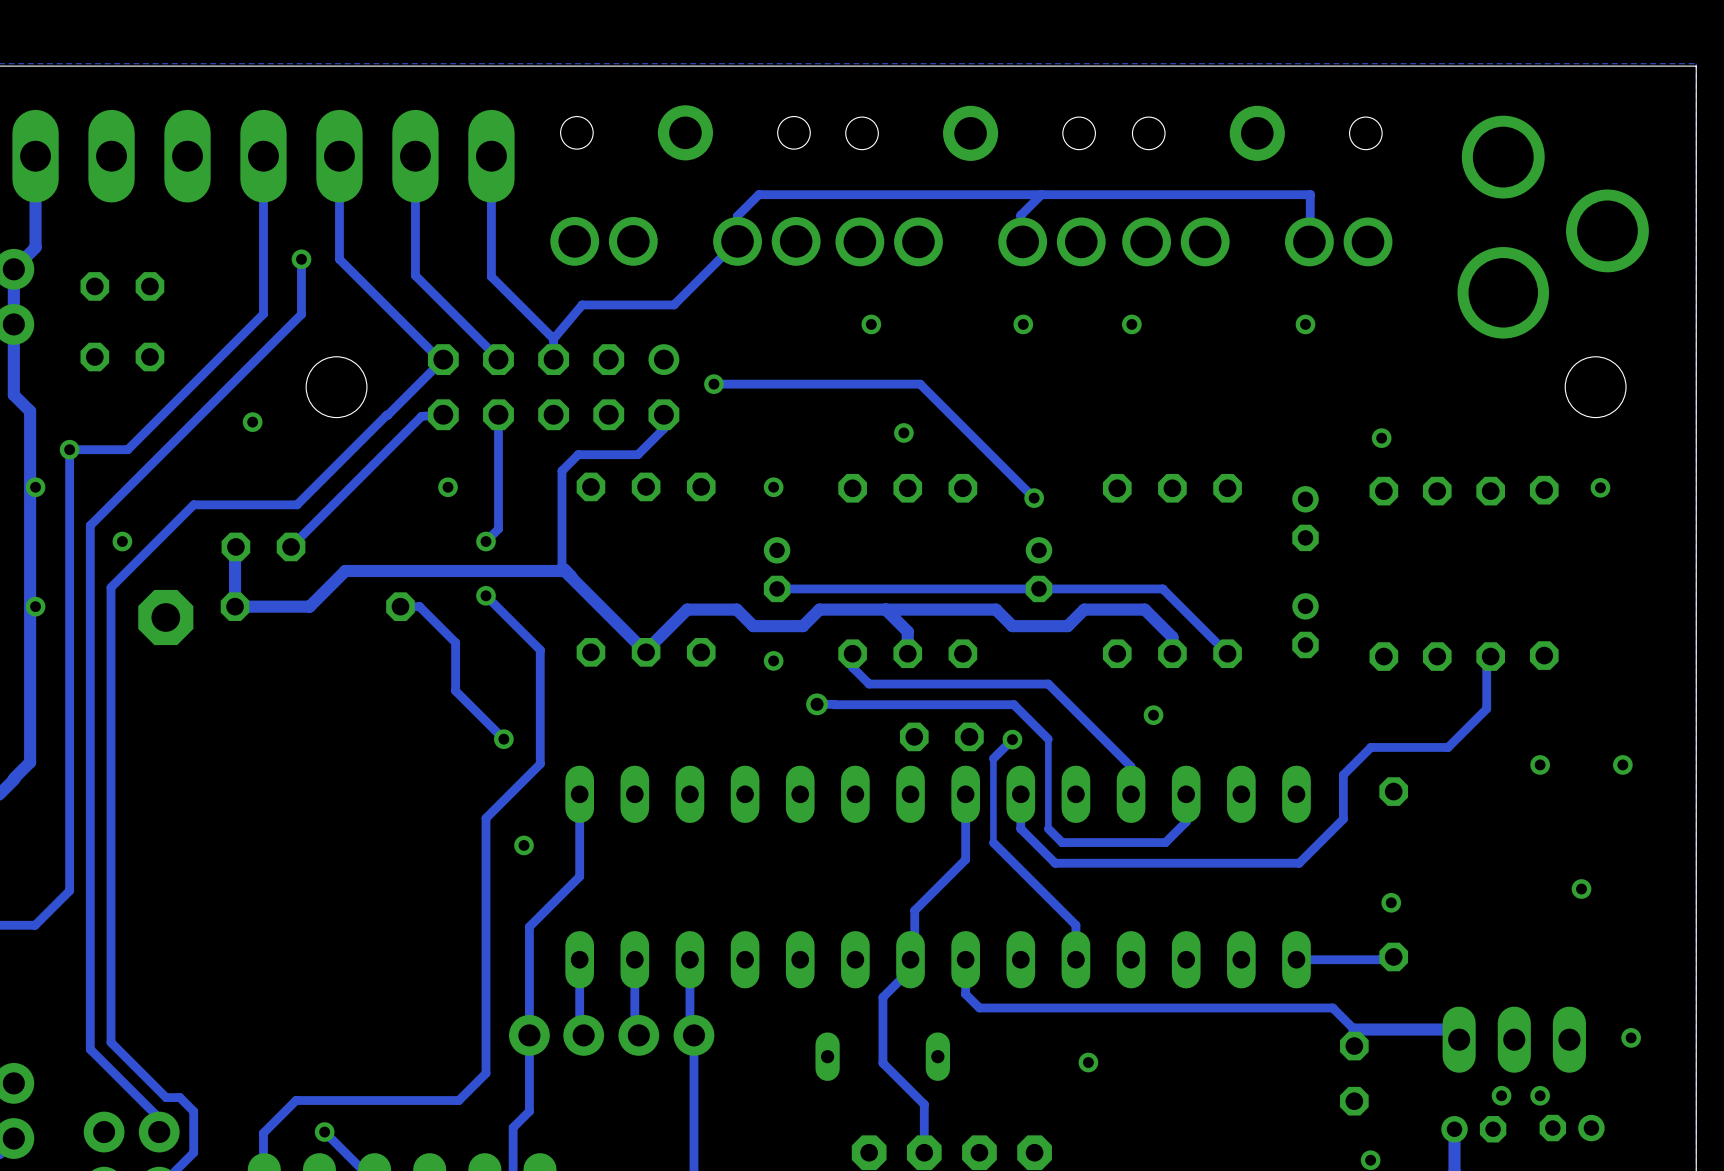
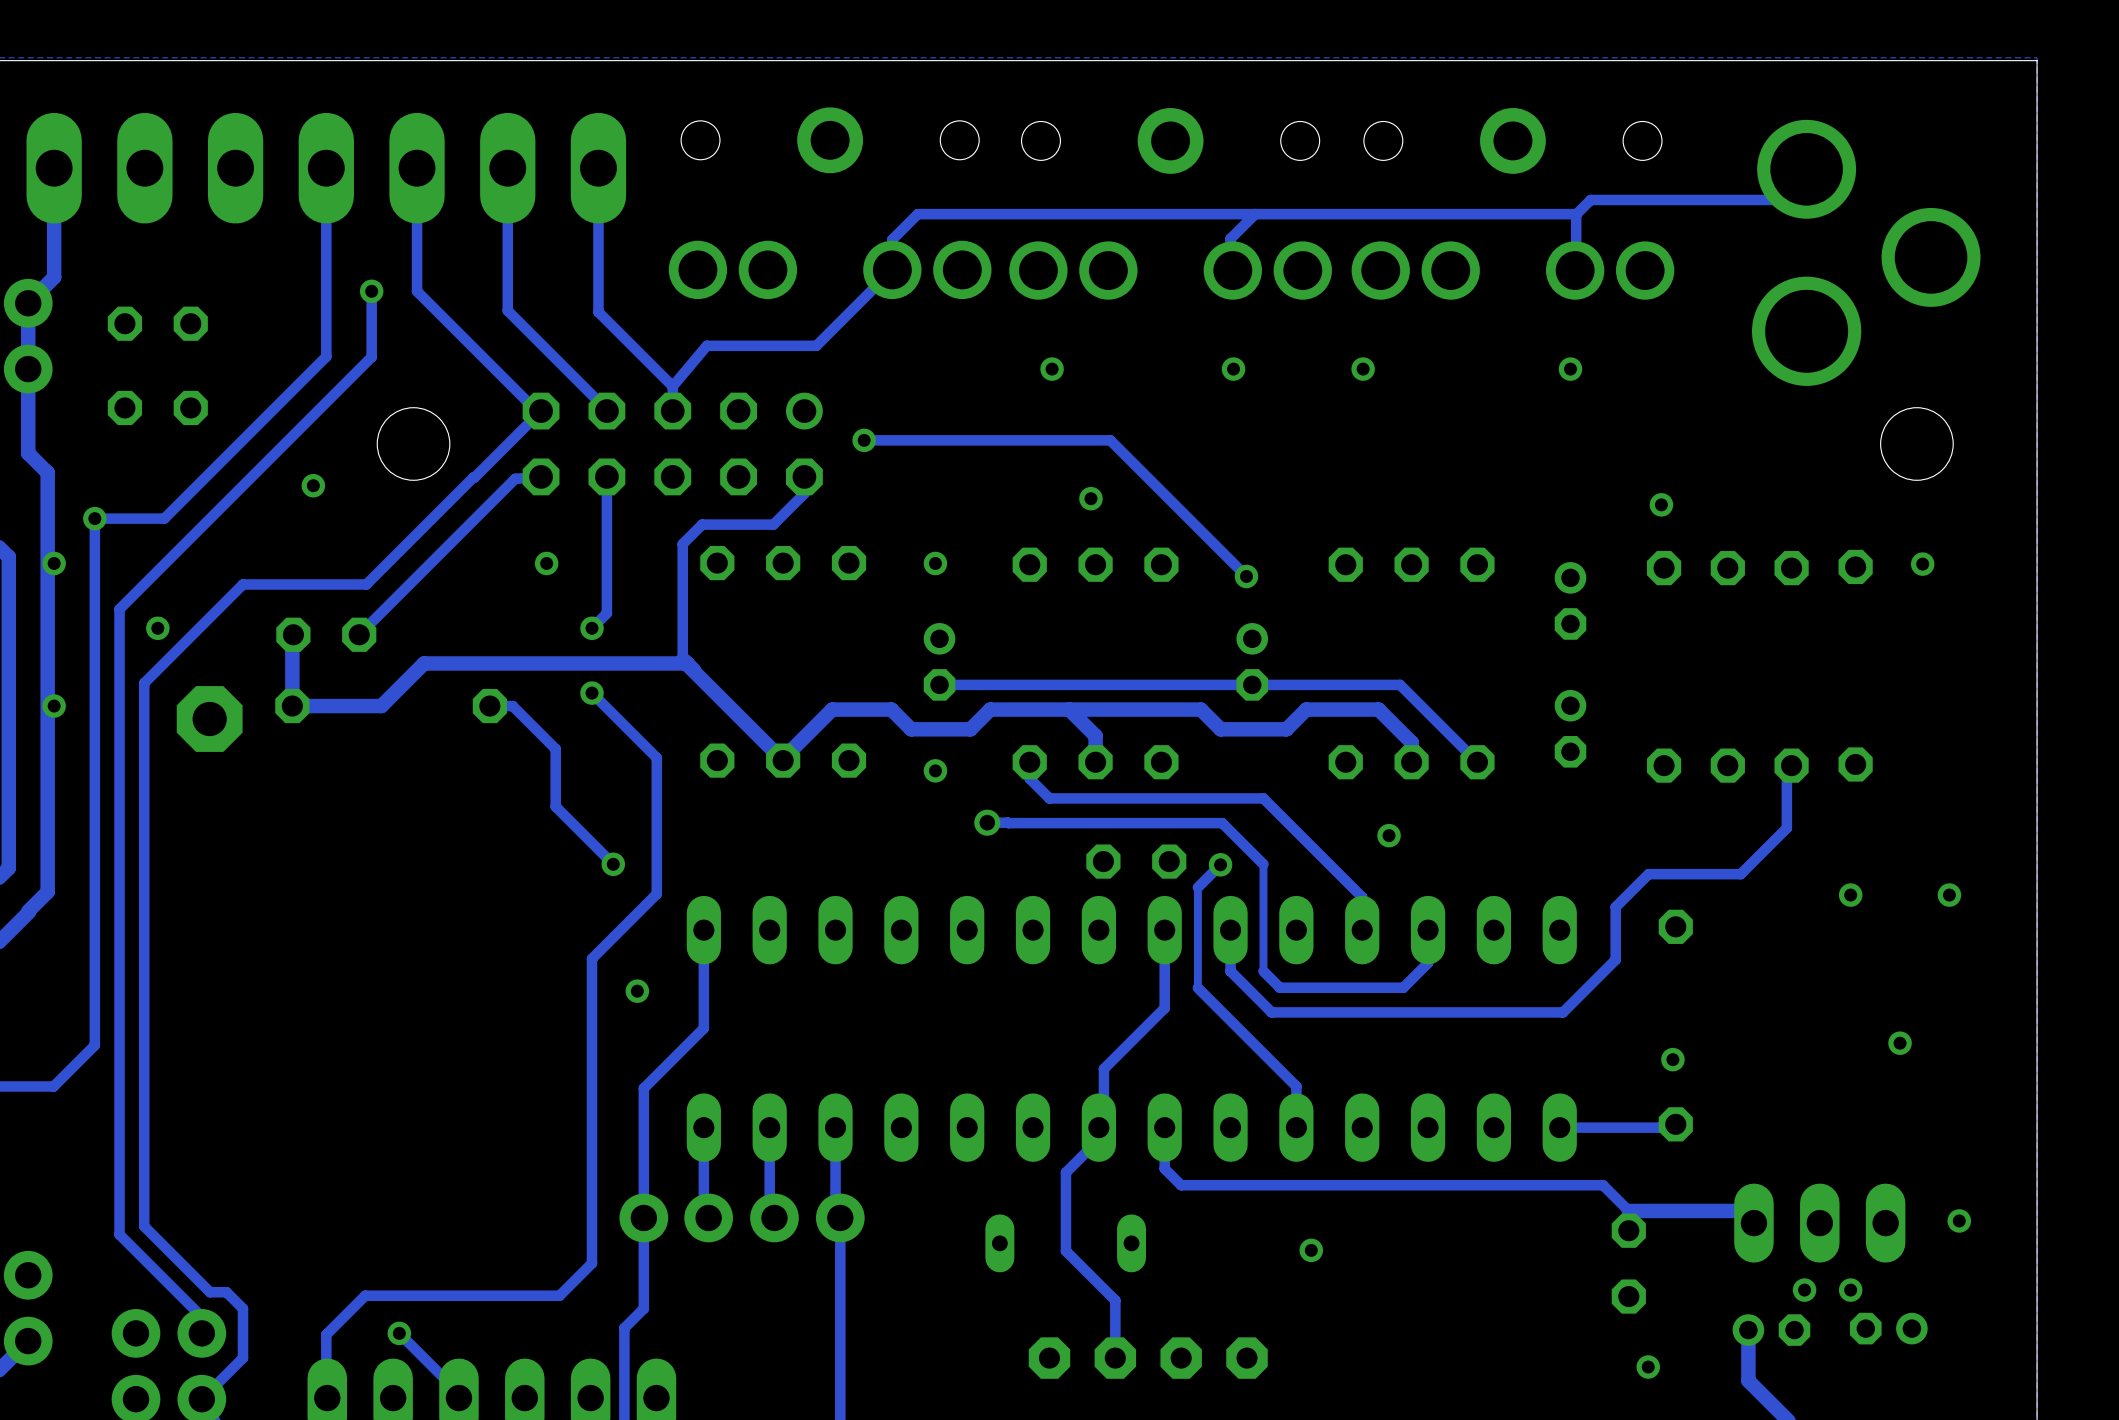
track: none -> (1775, 199) (1590, 199) (1576, 214)

